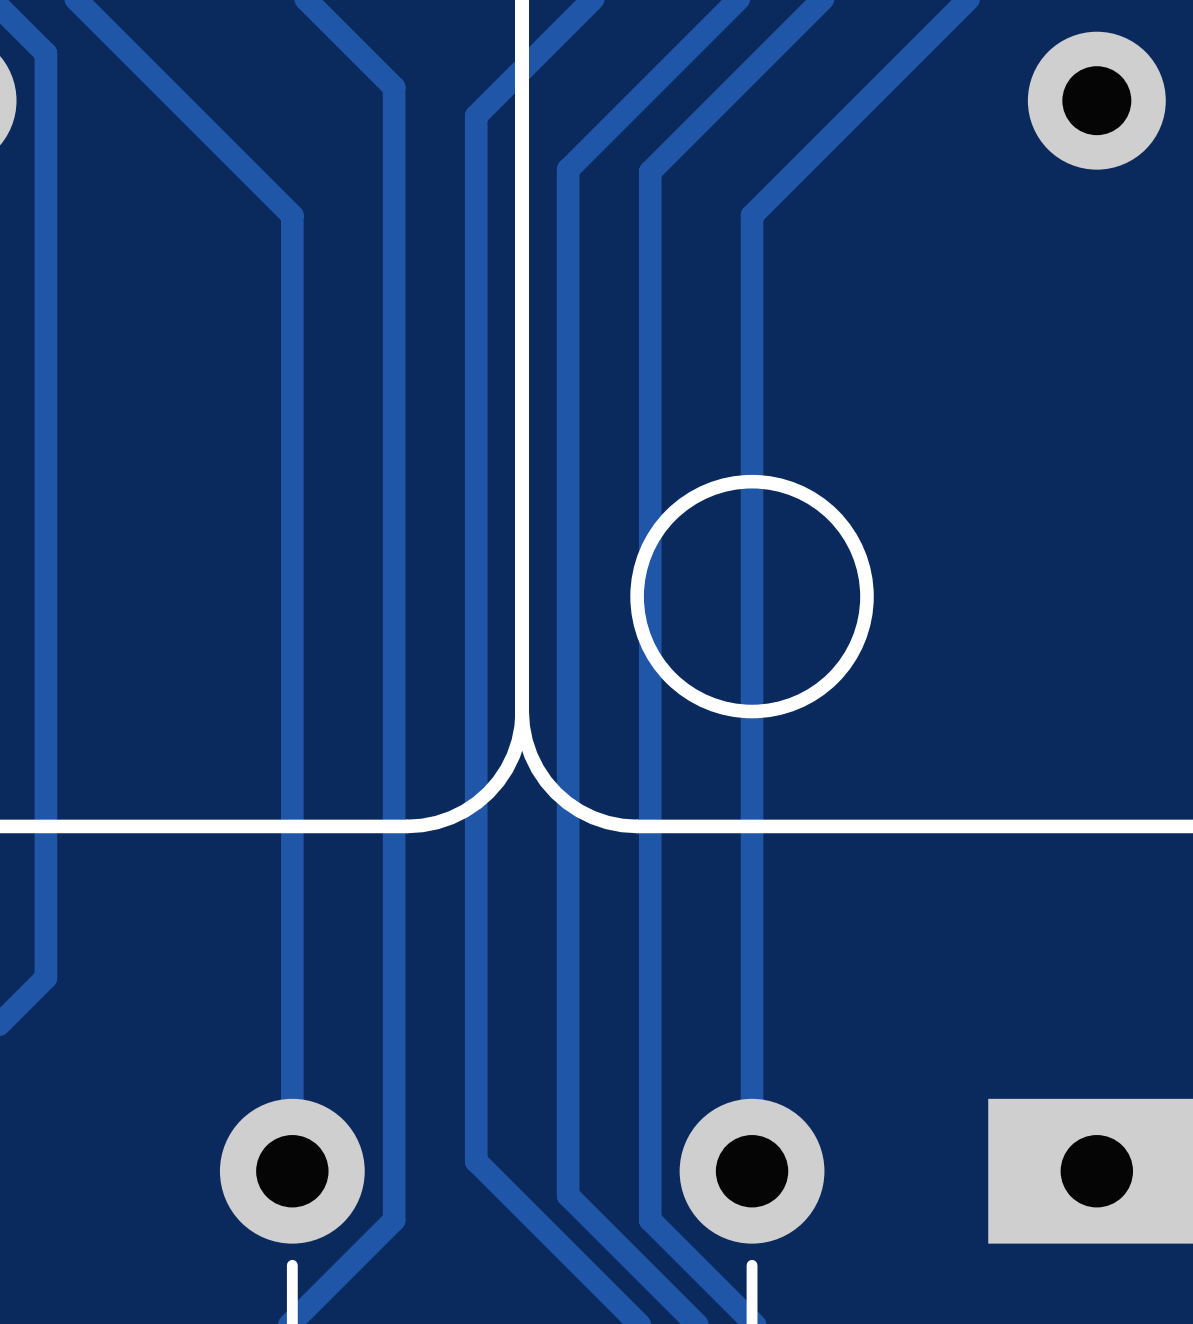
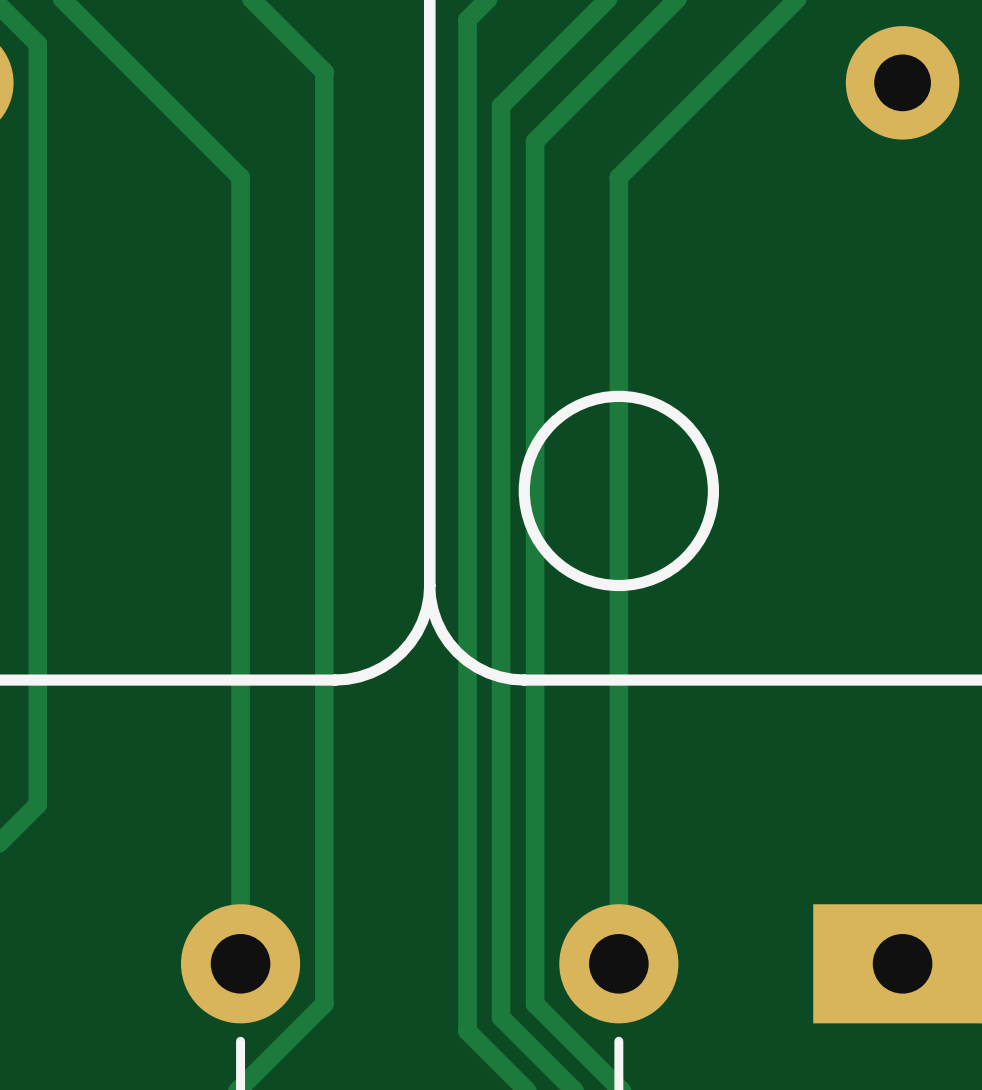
track: (568, 24) (476, 116) (476, 1161) (568, 1253) -> none
track: (608, 128) (568, 169) -> (467, 19) (467, 139)
track: none -> (501, 106) (501, 1017)
track: (568, 1195) (608, 1236) -> (467, 983) (467, 1031)

